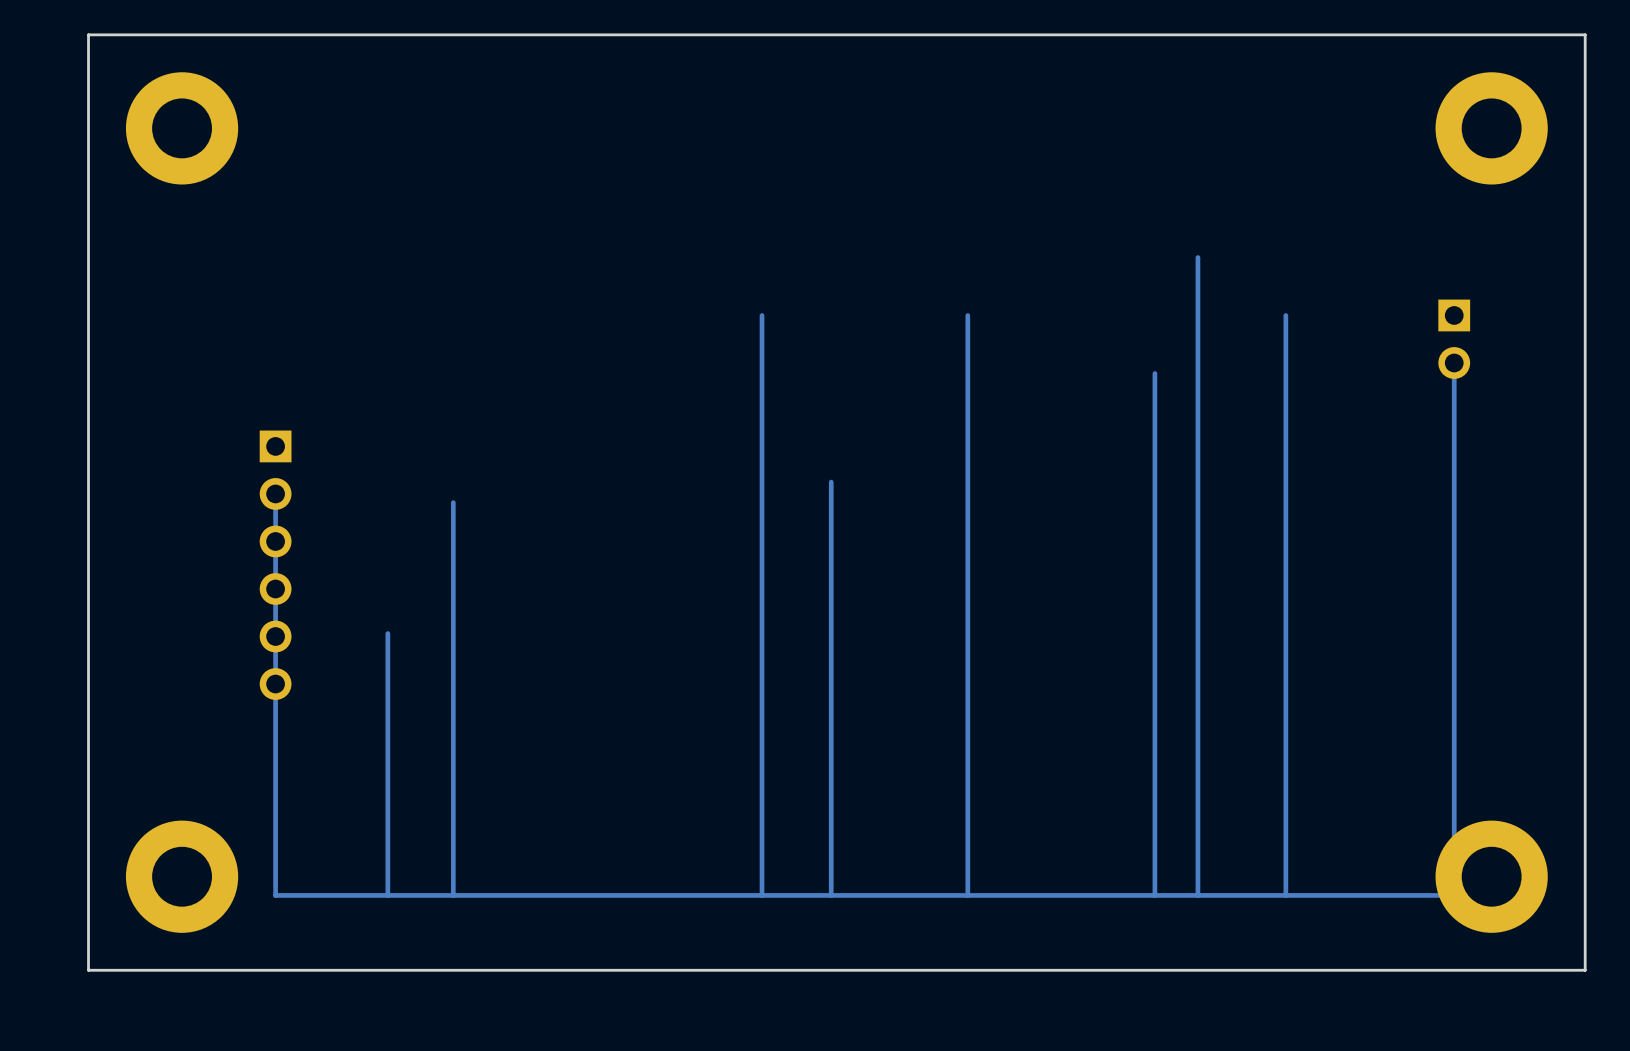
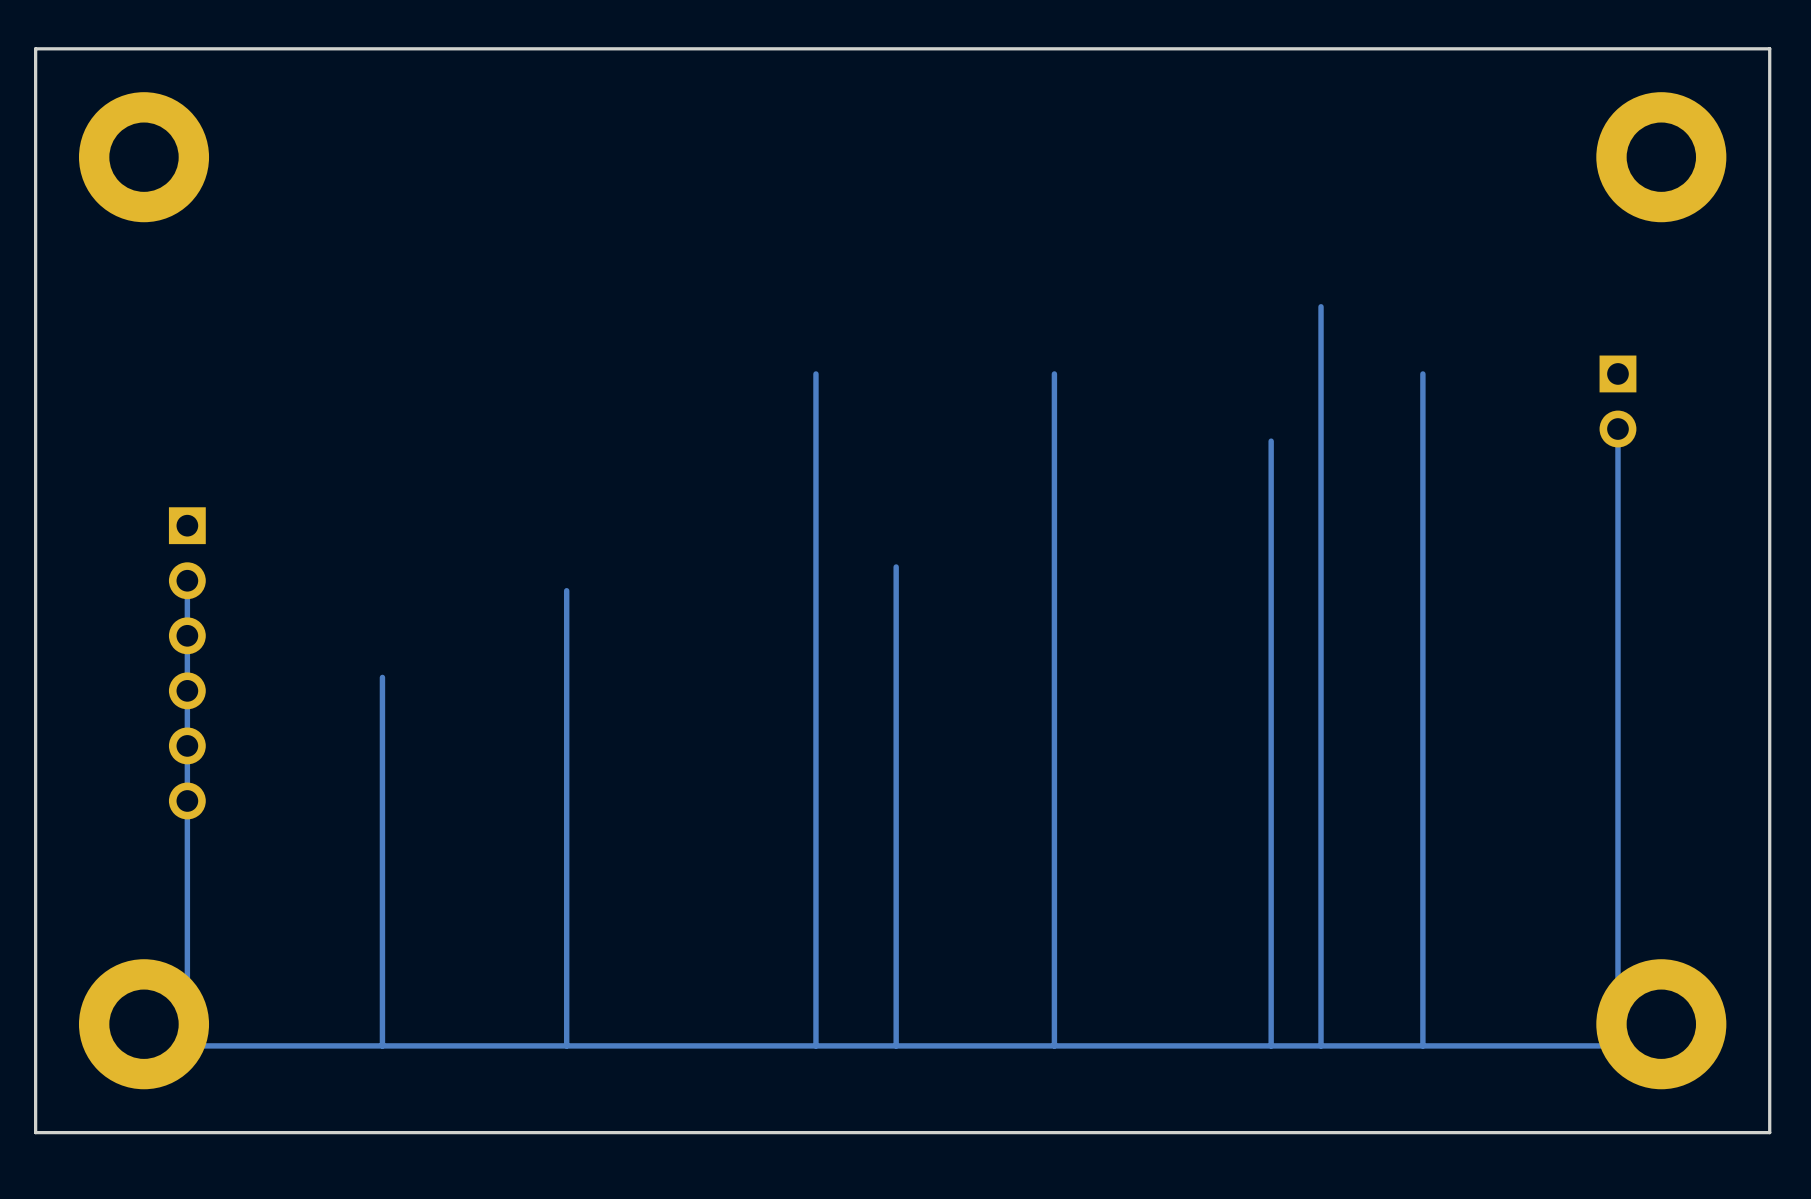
track: (275, 493) (275, 895) -> (187, 580) (187, 1045) (252, 1045)
track: (453, 502) (453, 895) -> (566, 590) (566, 1045)
part position: (275, 565) -> (187, 663)
track: none -> (382, 677) (382, 742)

